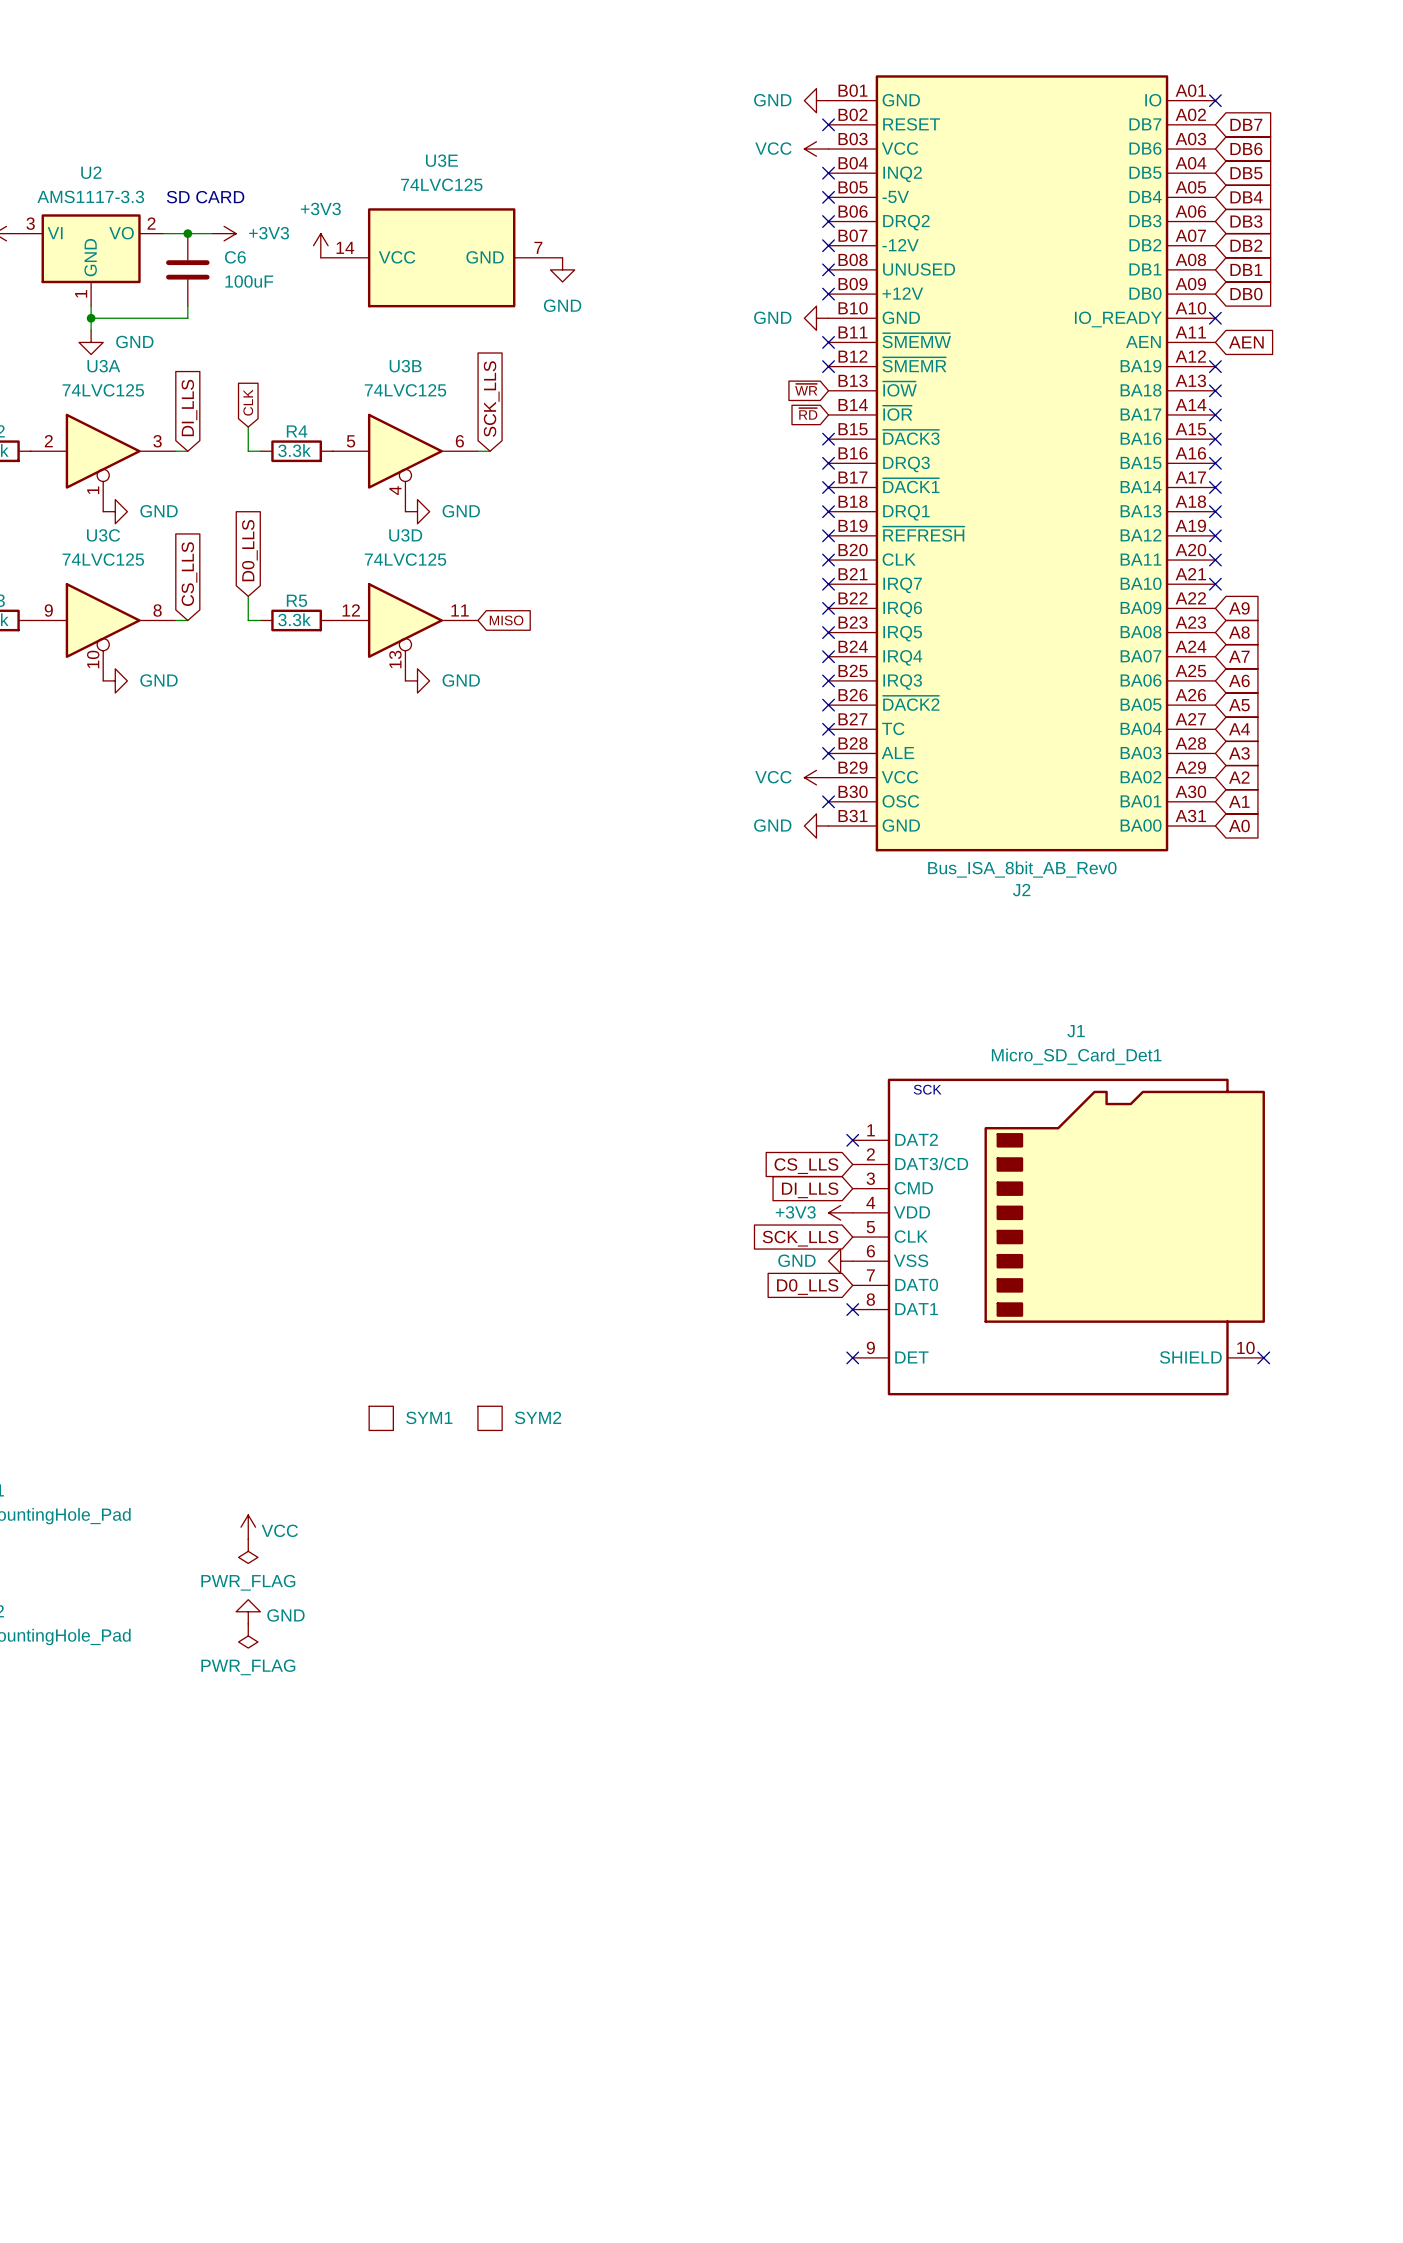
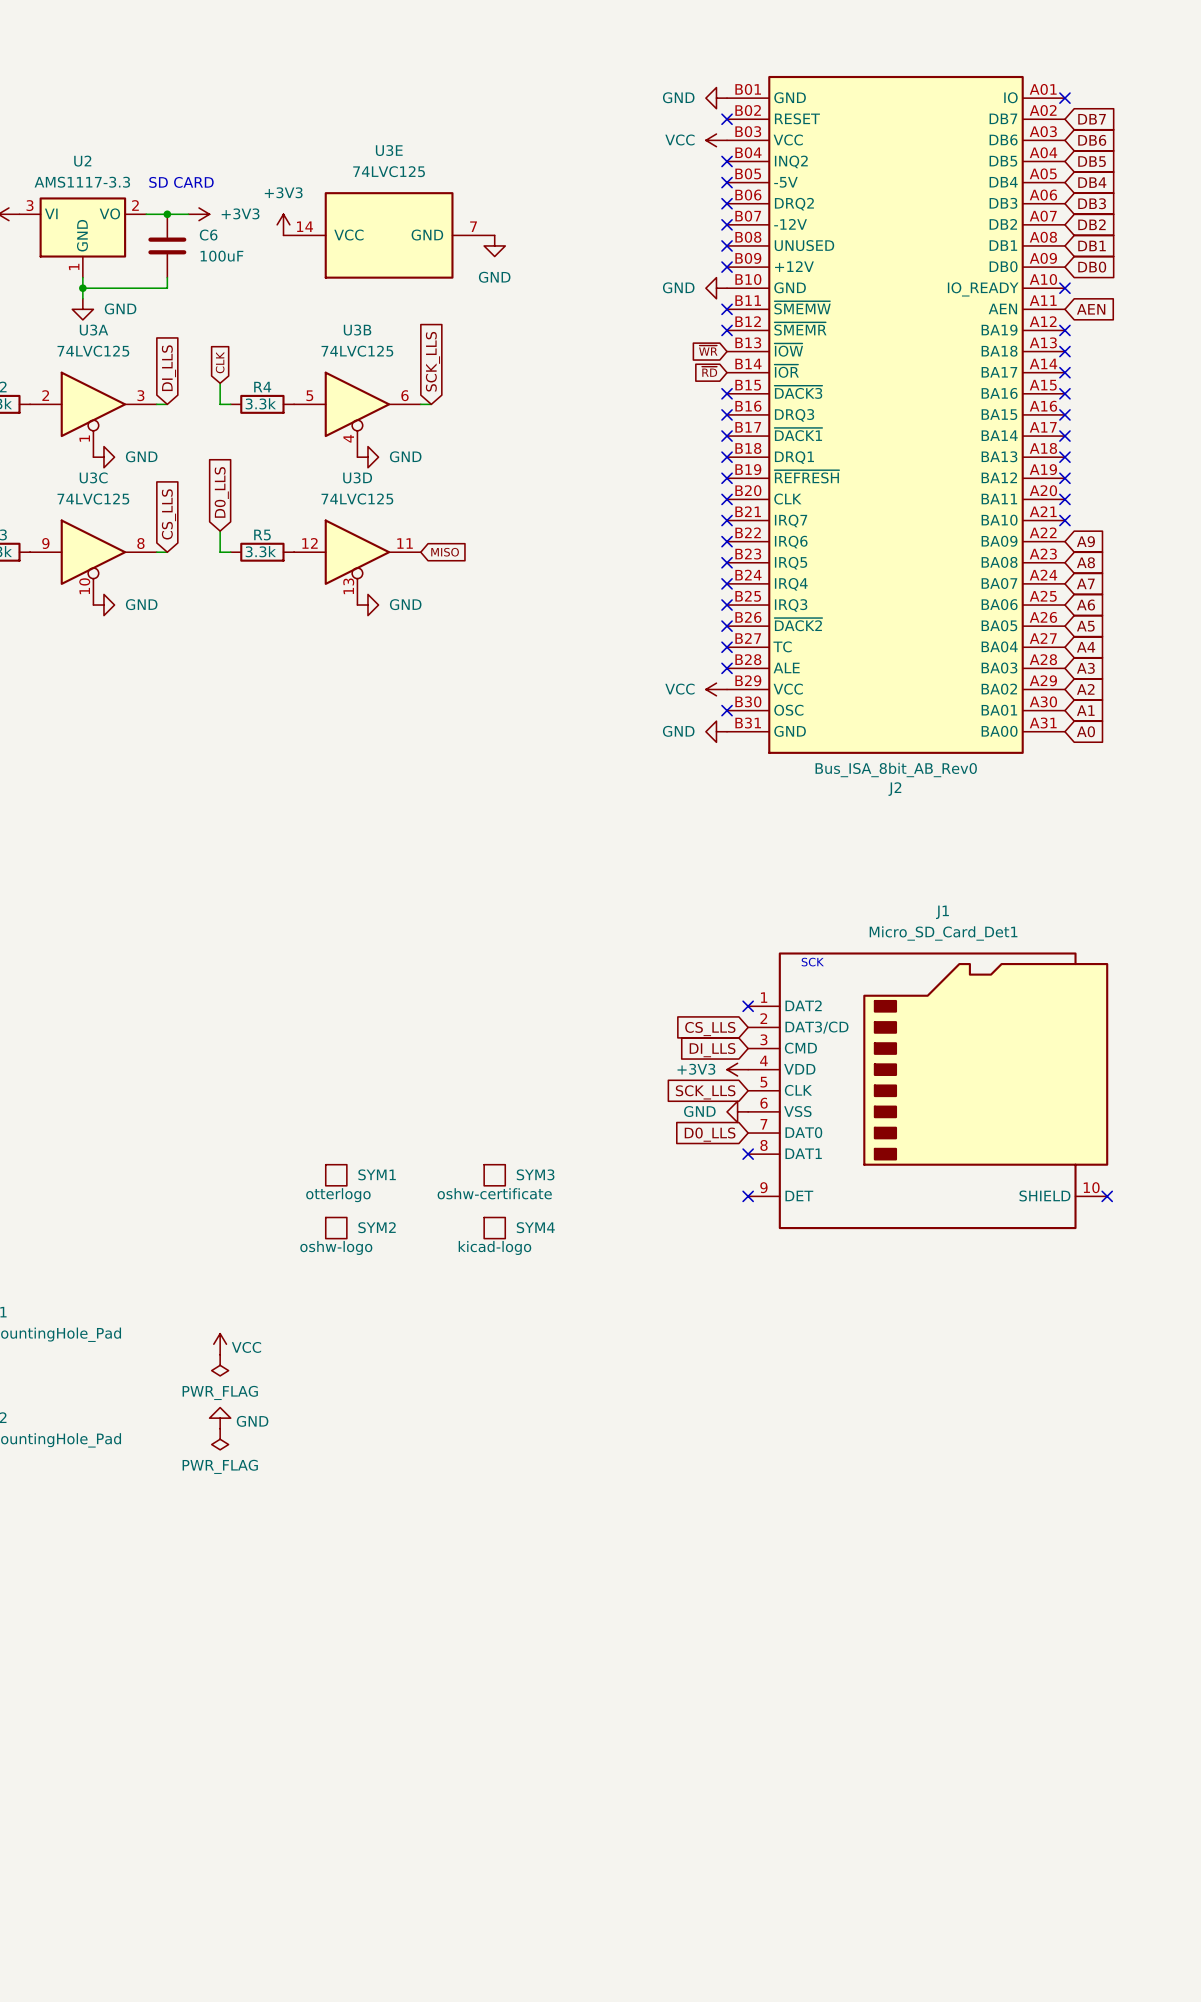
SYM3: none -> oshw-certificate (494, 1175)
SYM1 value: none -> otterlogo (338, 1195)
SYM4: none -> kicad-logo (494, 1228)
SYM2 value: none -> oshw-logo (336, 1247)
SYM1 position: (381, 1418) -> (336, 1175)
SYM2 position: (490, 1418) -> (336, 1228)

